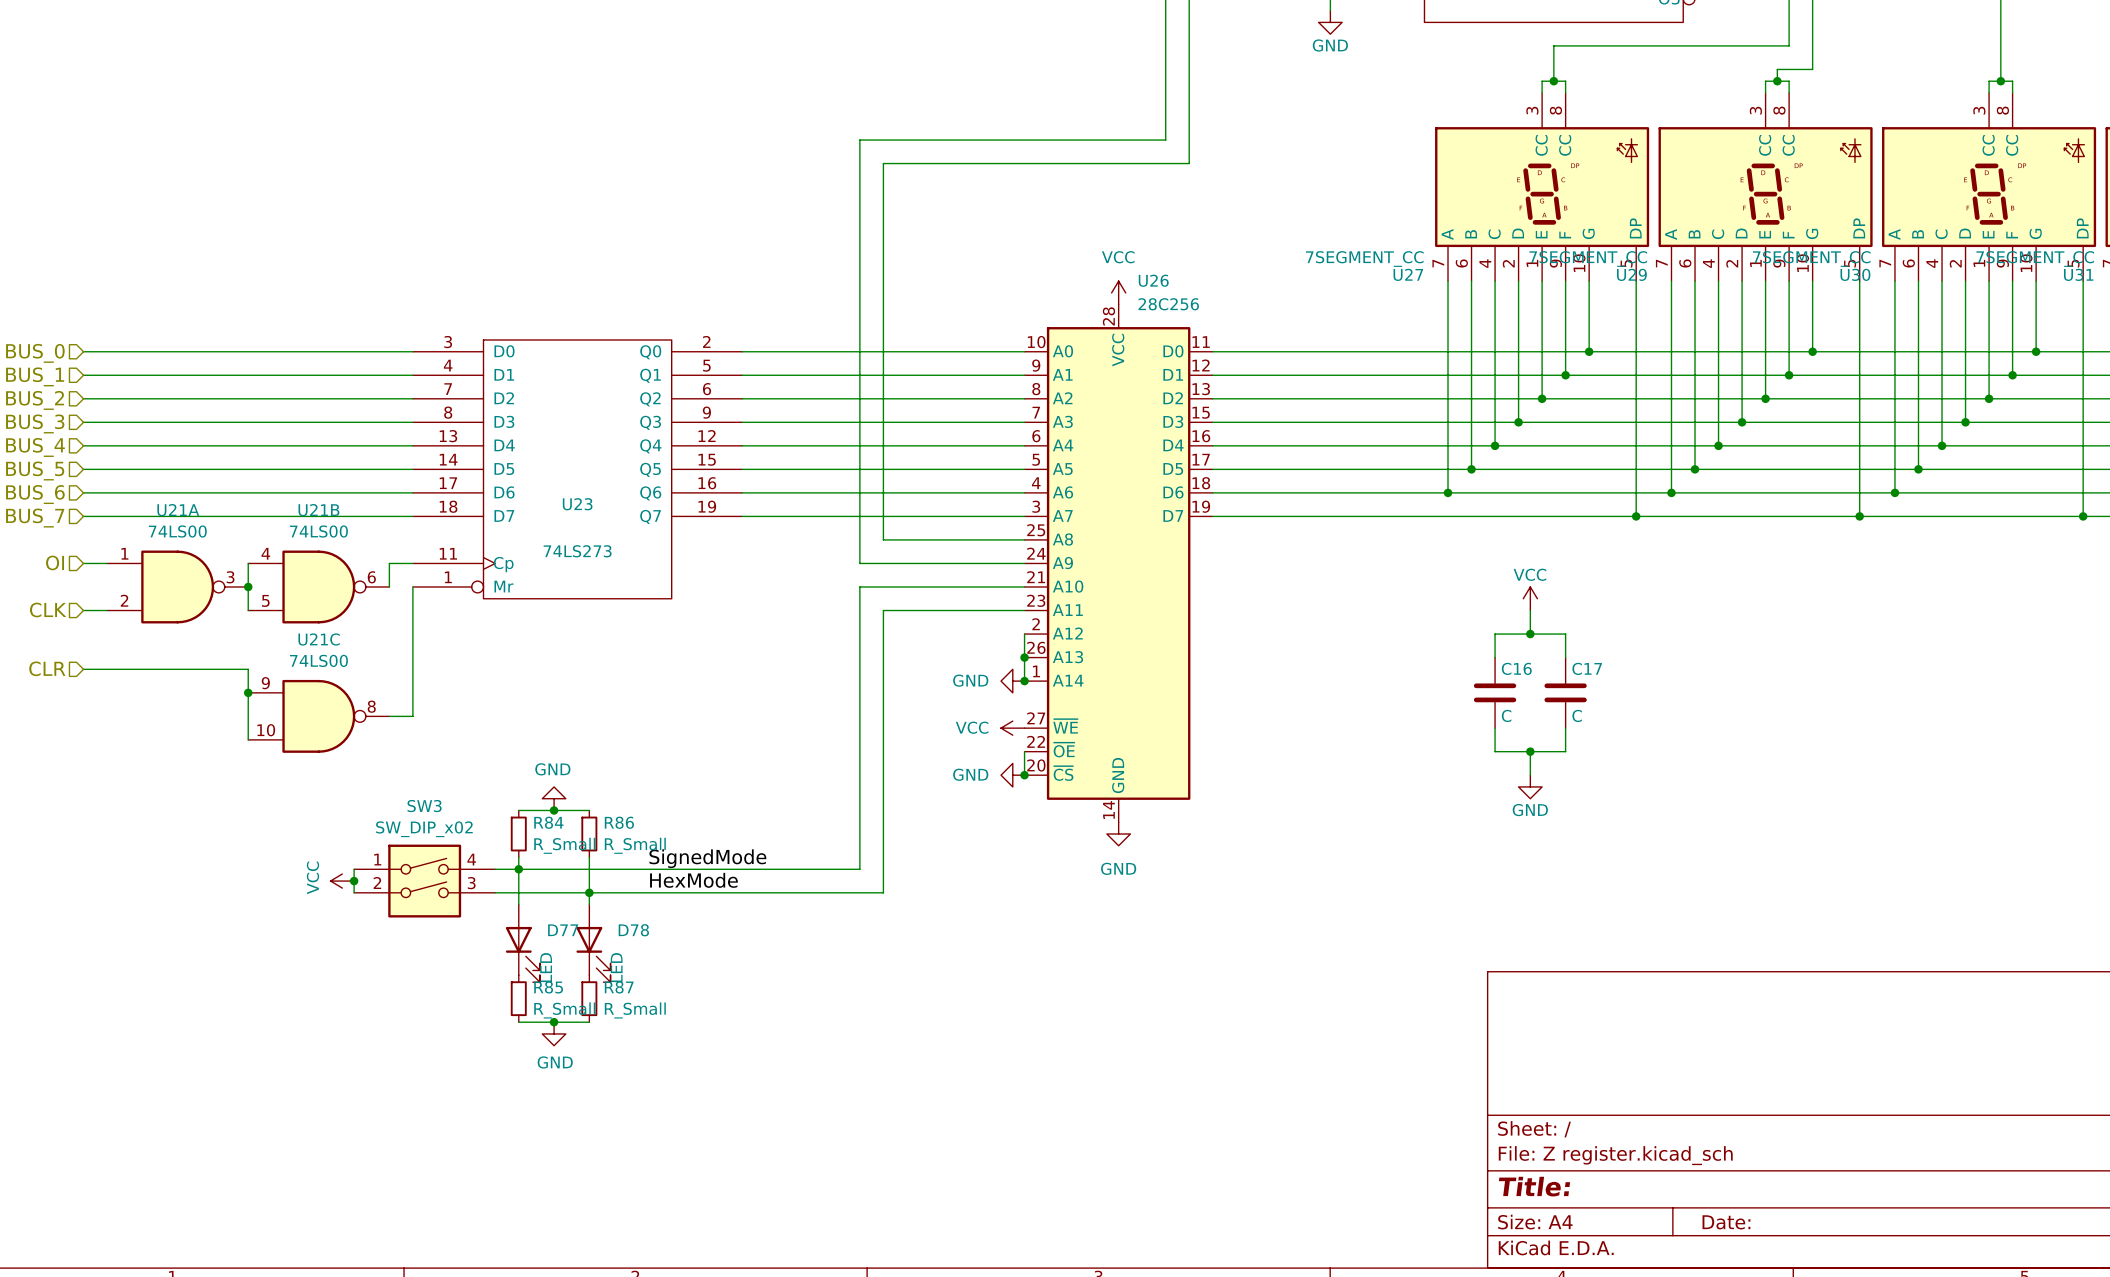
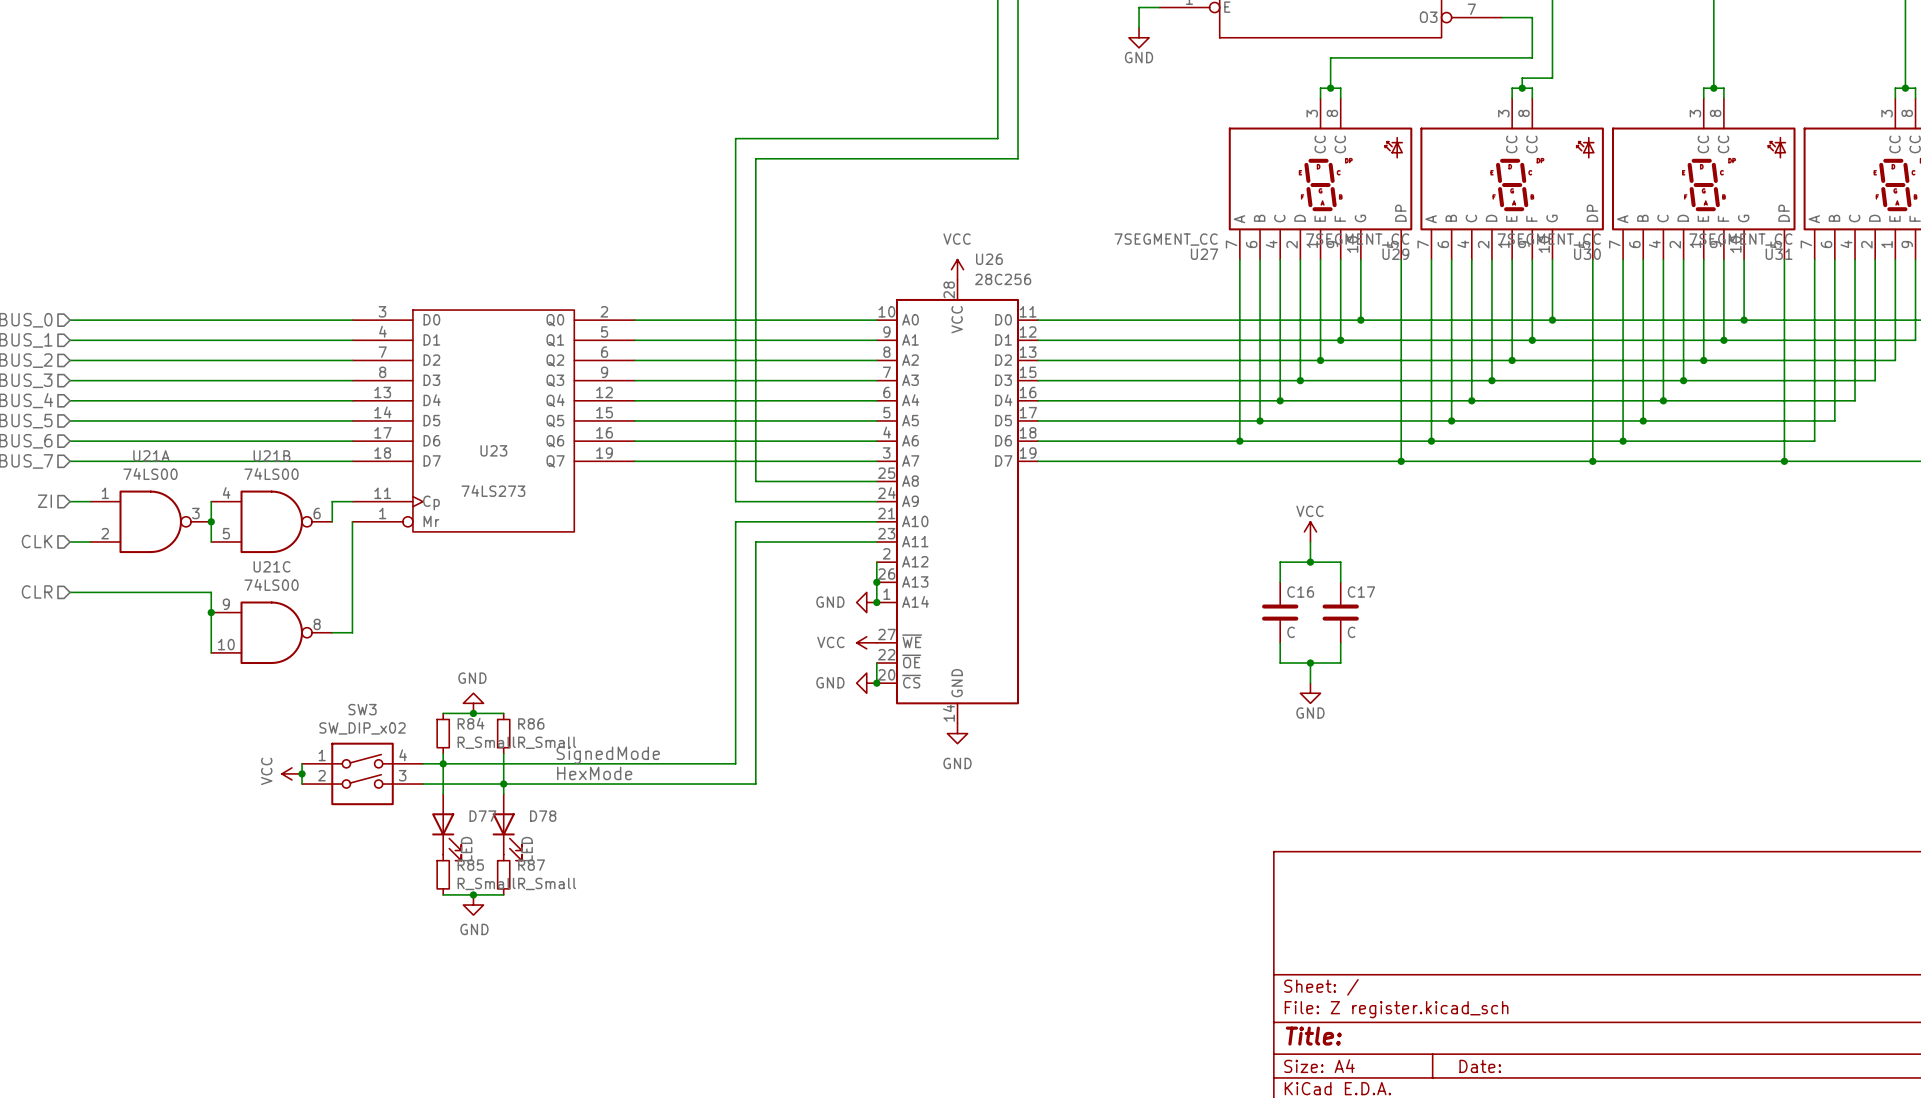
hierarchical label: OI (55, 562) -> ZI (44, 501)

